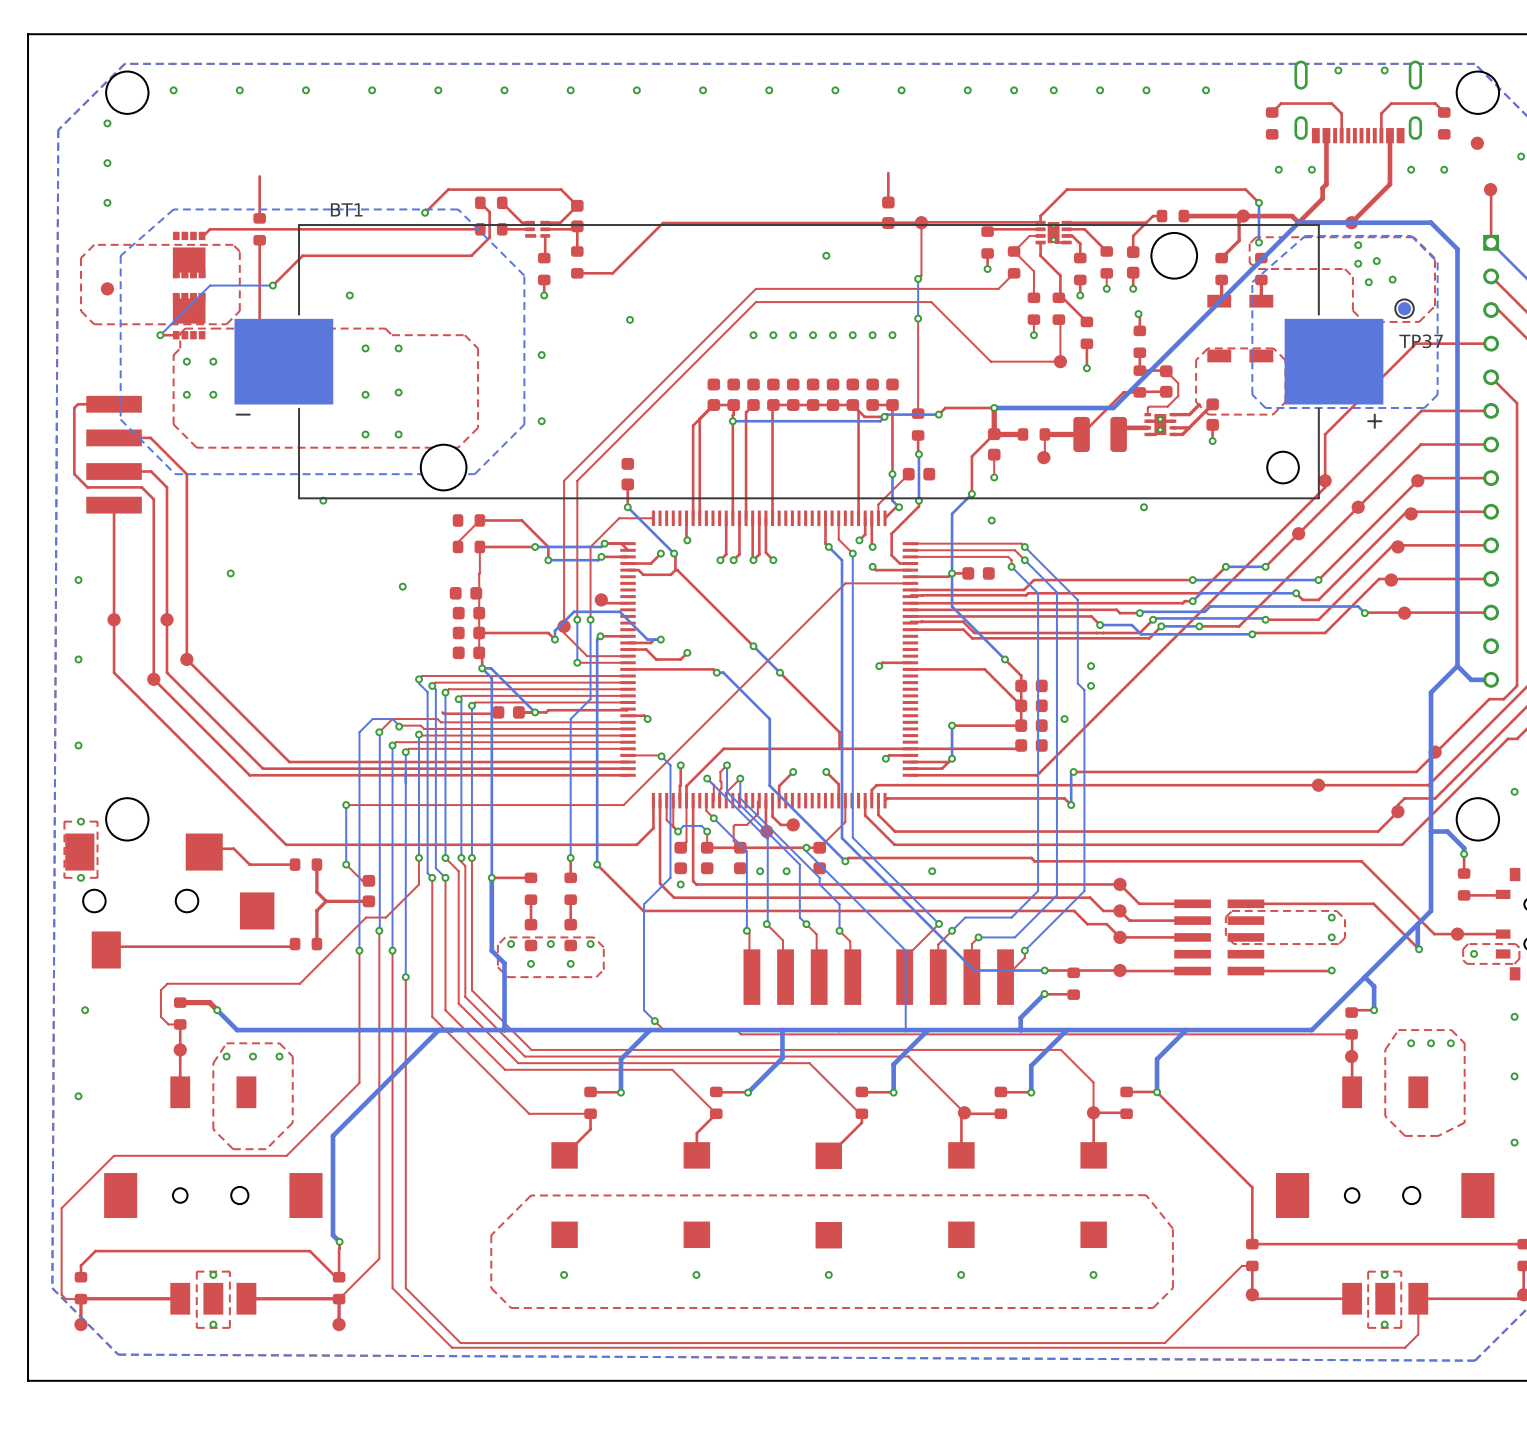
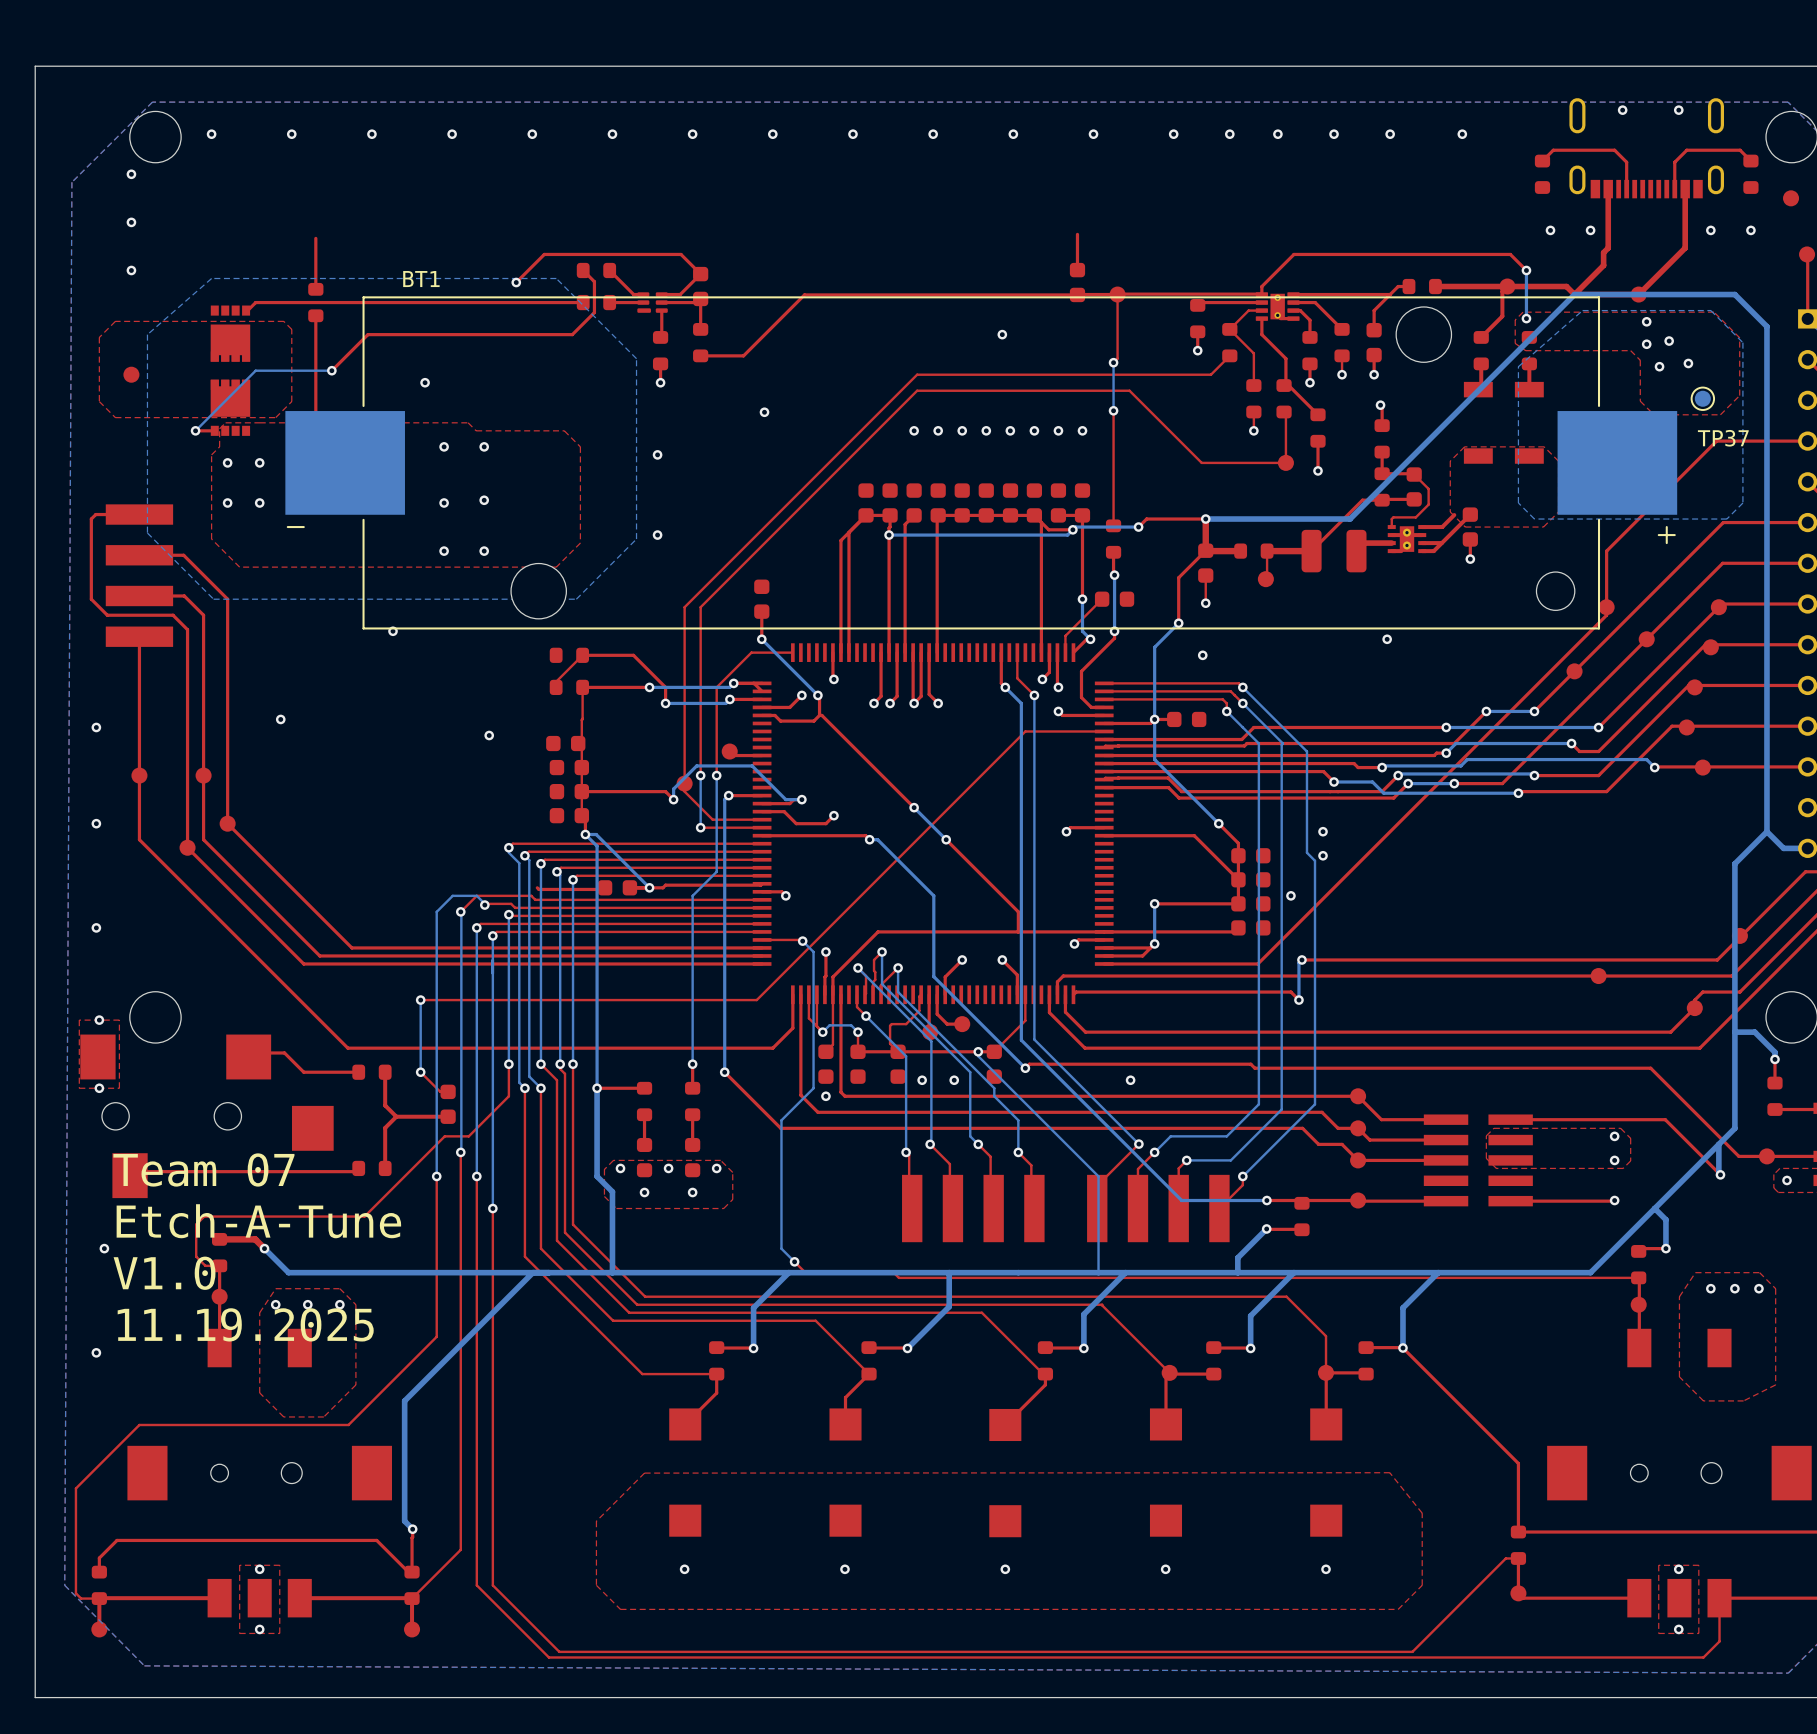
text: none -> Team 07 (203, 1169)
text: none -> Etch-A-Tune (258, 1221)
text: none -> V1.0 (164, 1273)
text: none -> 11.19.2025 (245, 1324)

